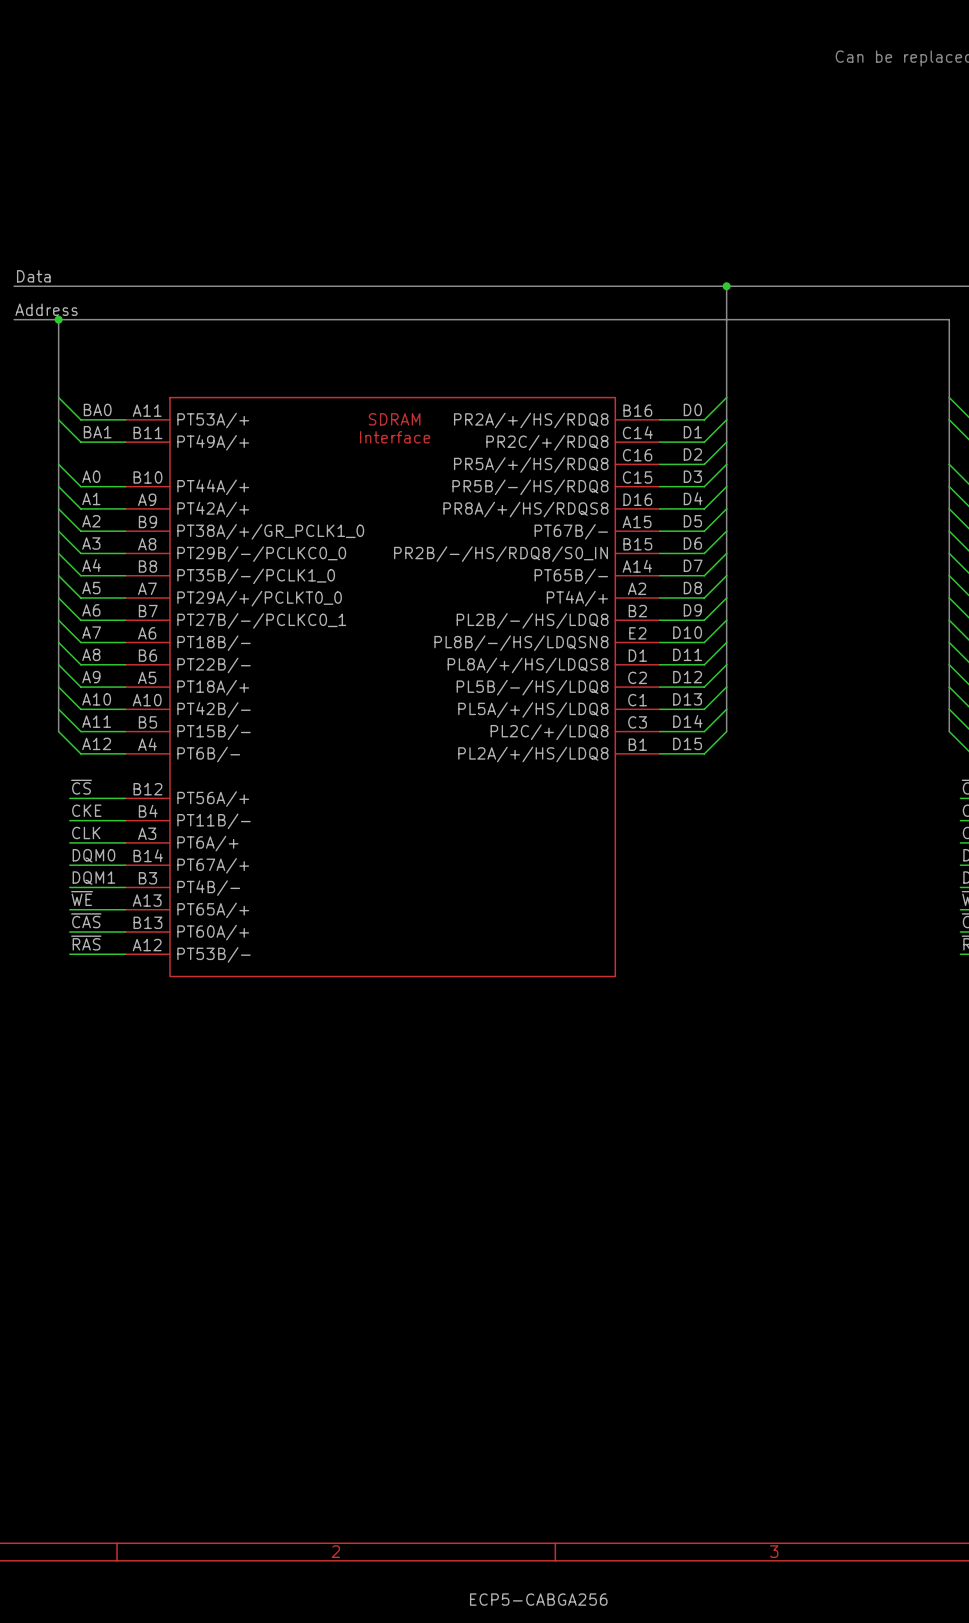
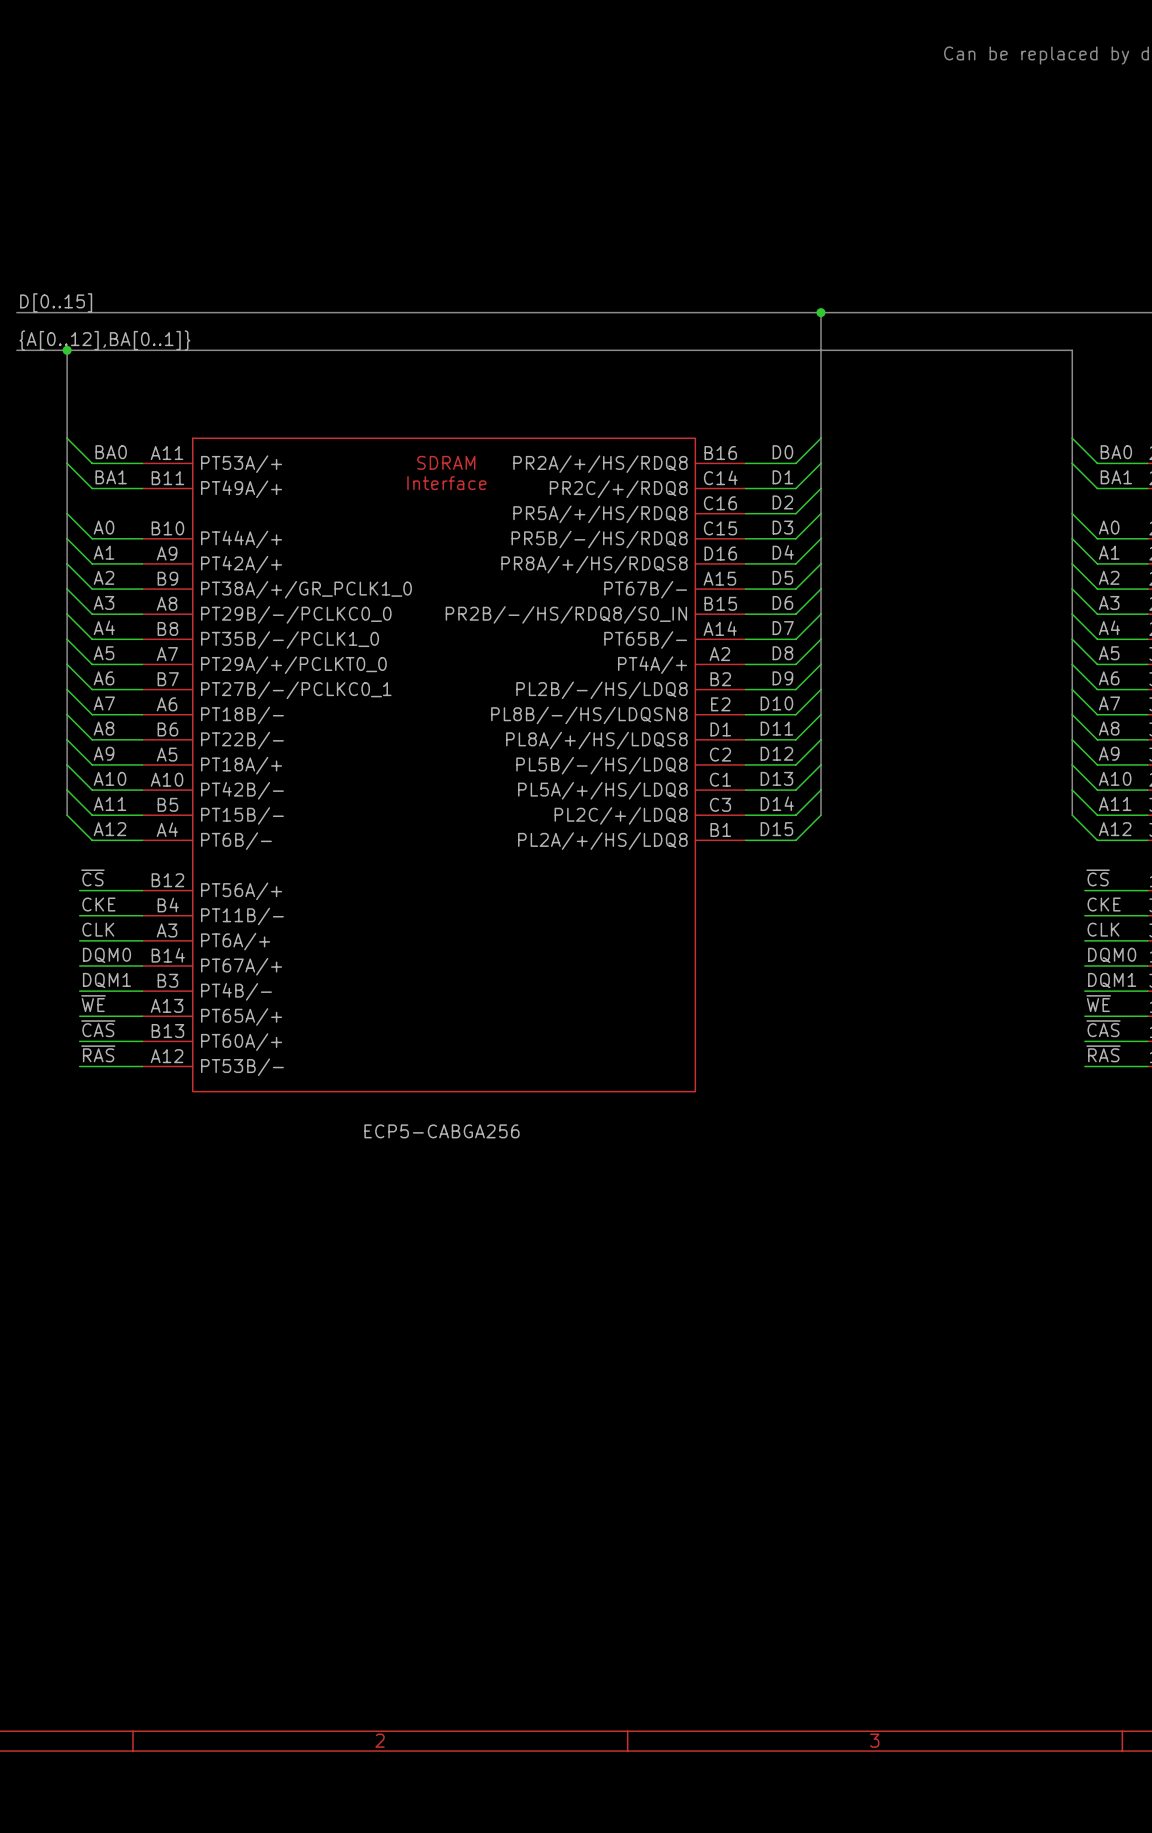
label: Data (33, 276) -> D[0..15] (56, 302)
label: Address (46, 309) -> {A[0..12],BA[0..1]} (104, 340)
part value position: ECP5-CABGA256 (538, 1599) -> ECP5-CABGA256 (441, 1131)

